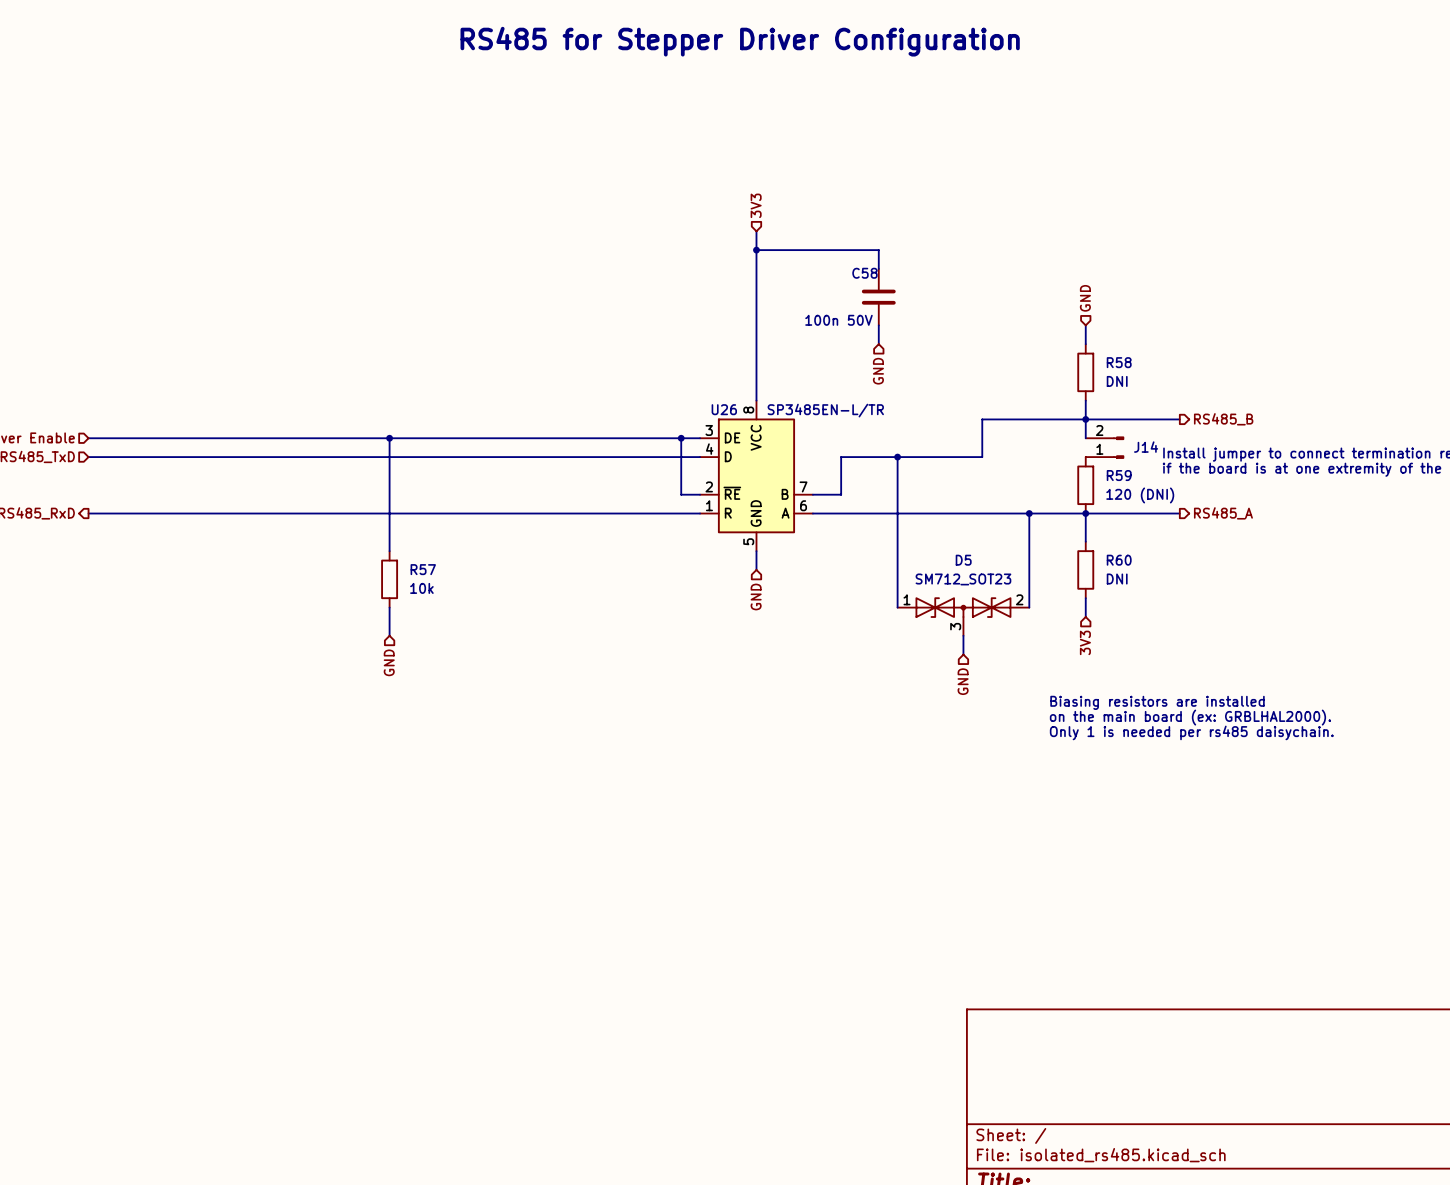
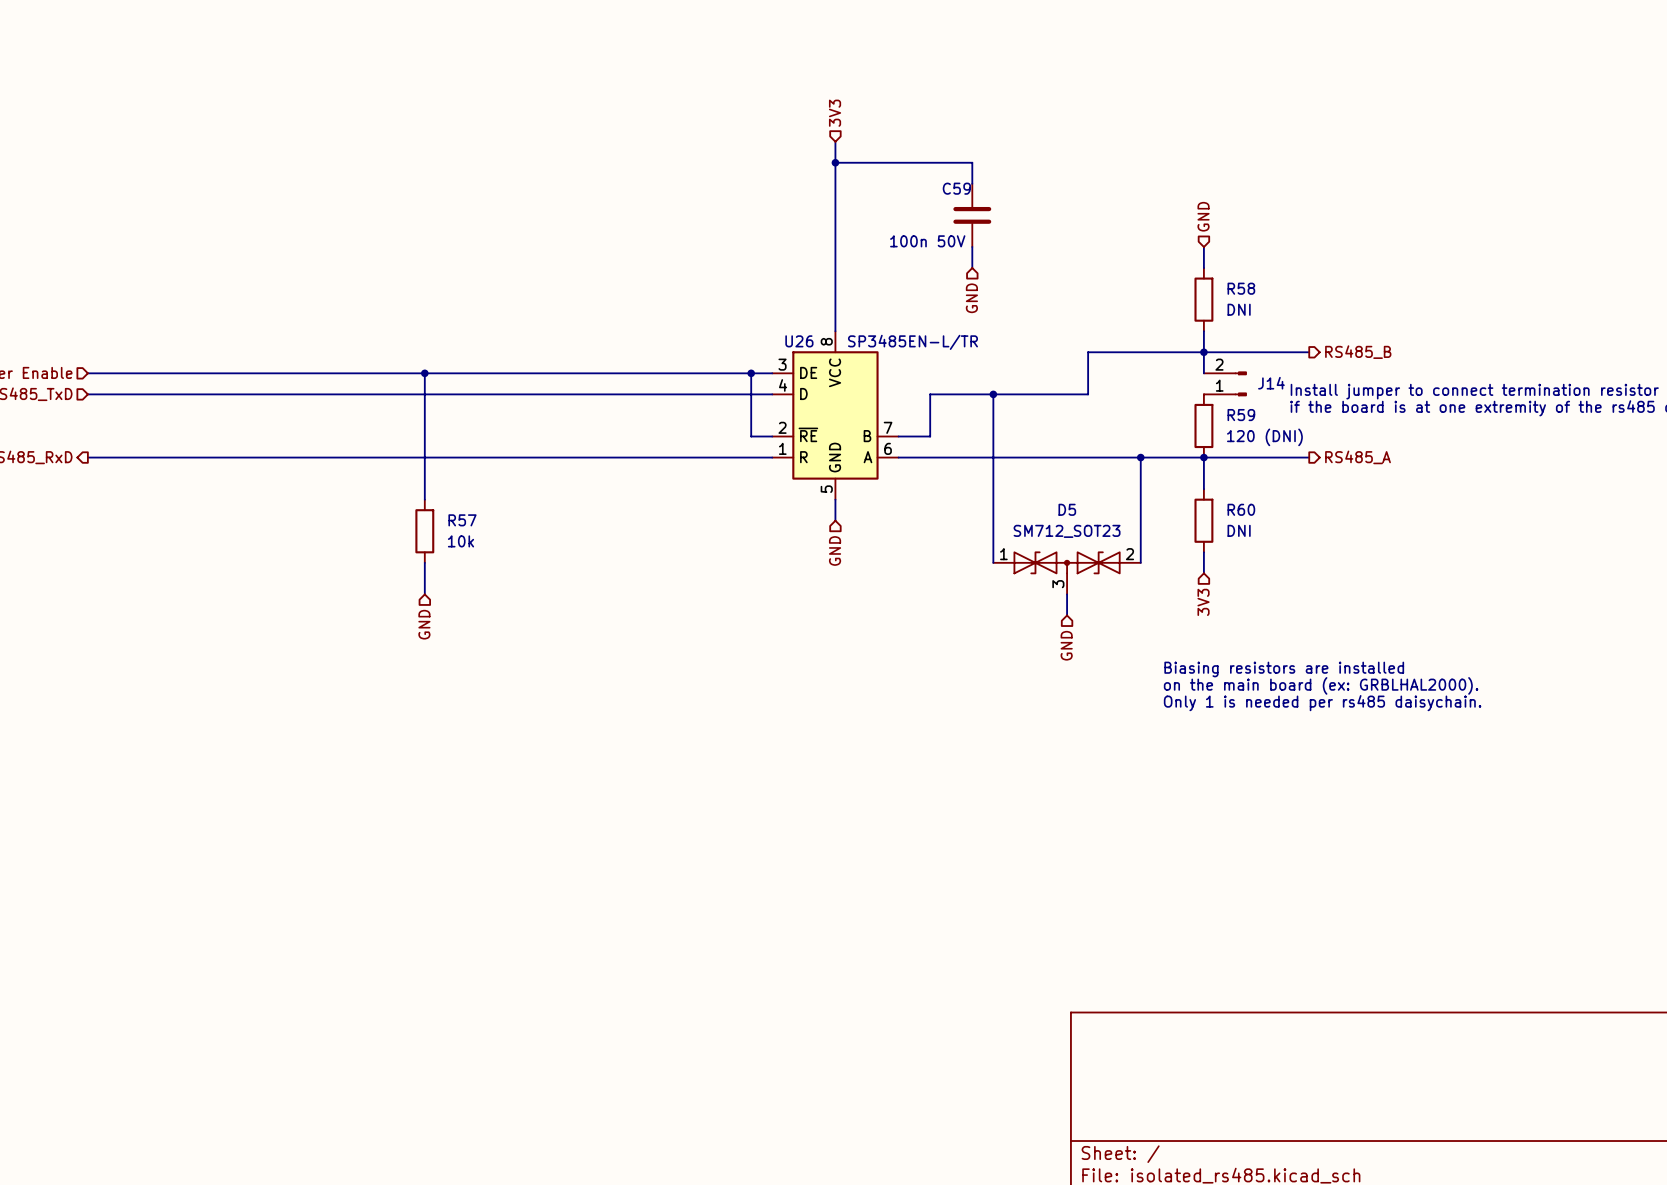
C58 name: C58 (864, 273) -> C59 (956, 188)

